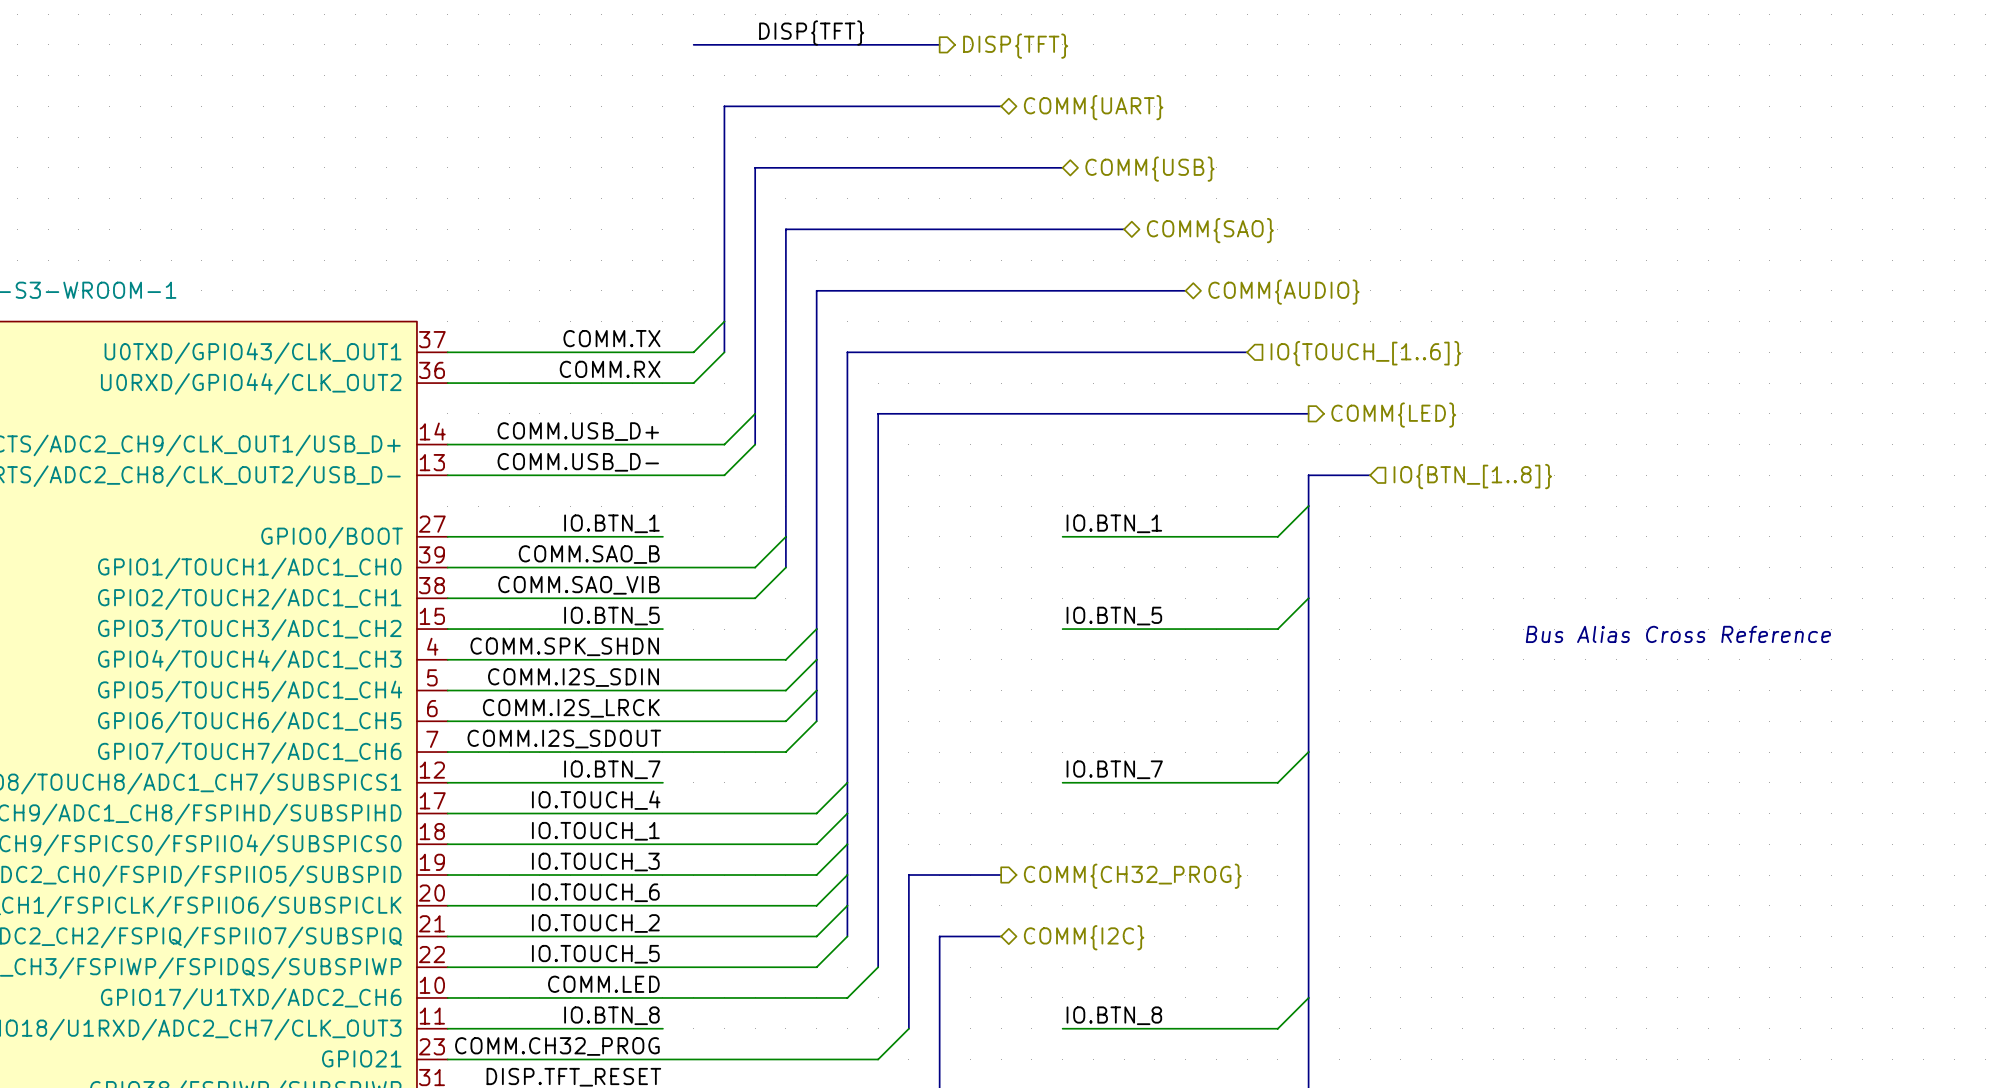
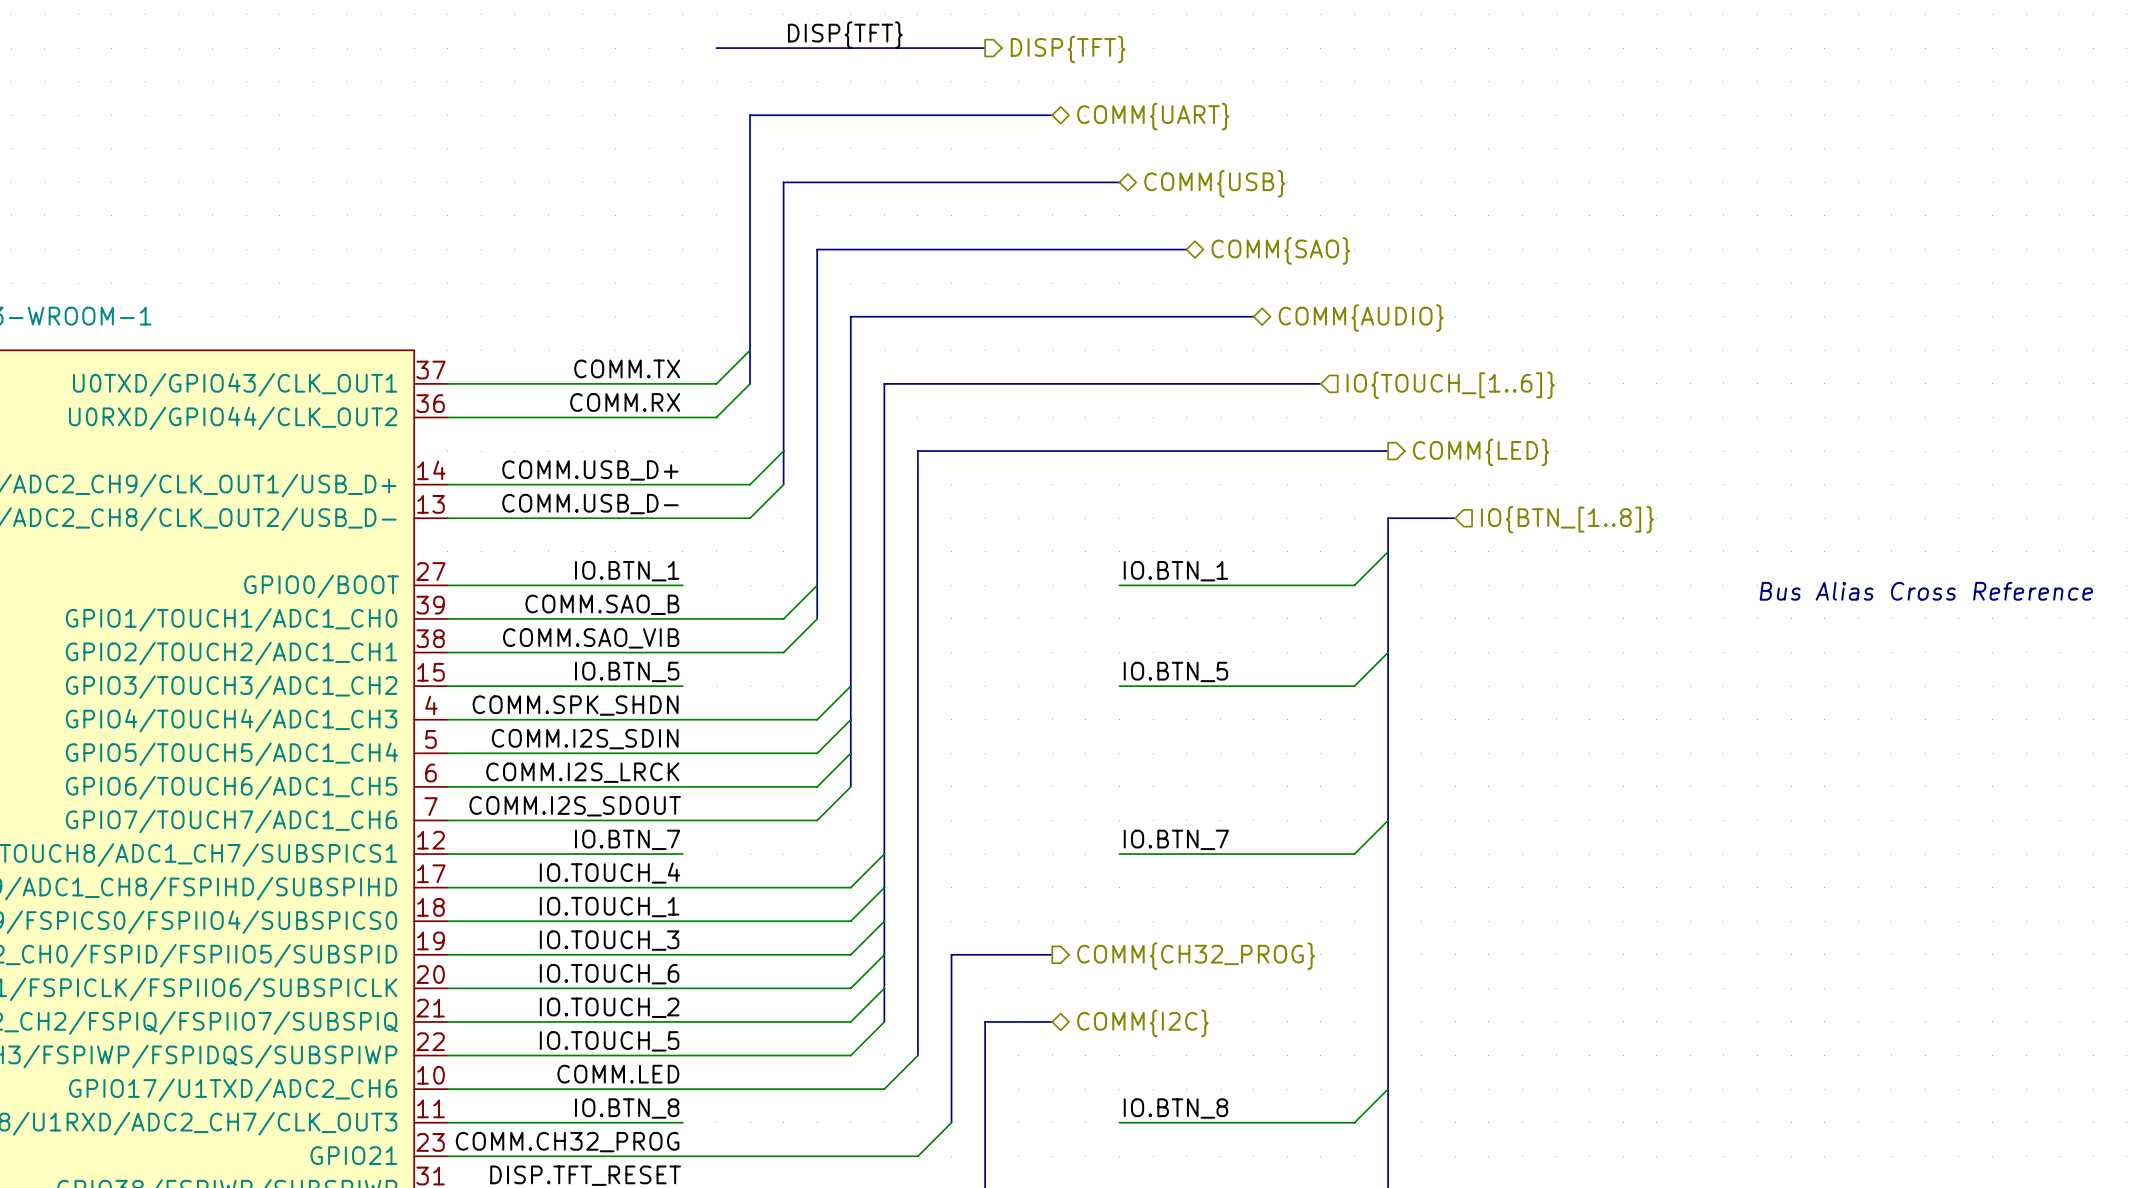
text position: Bus Alias Cross Reference (1678, 634) -> Bus Alias Cross Reference (1926, 591)

